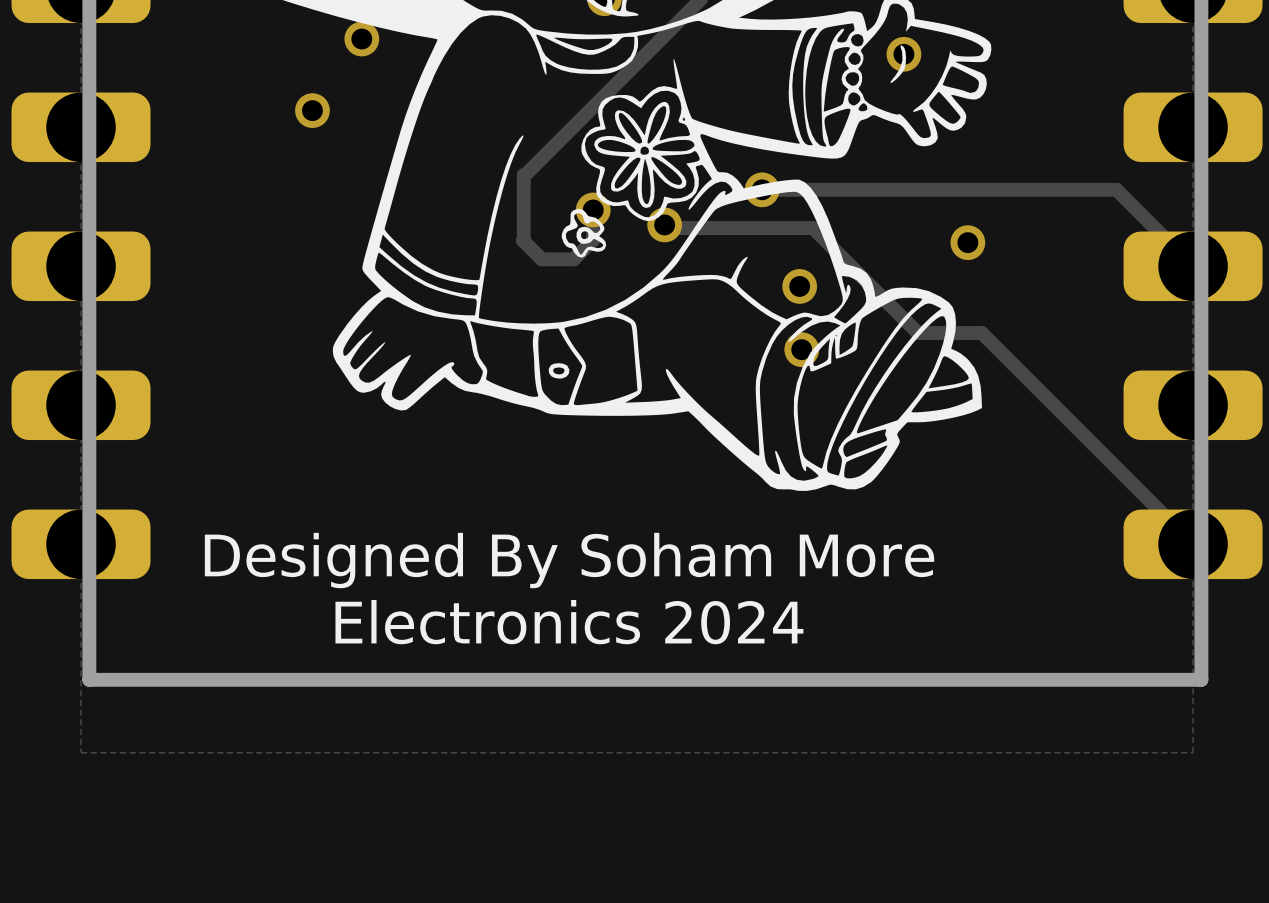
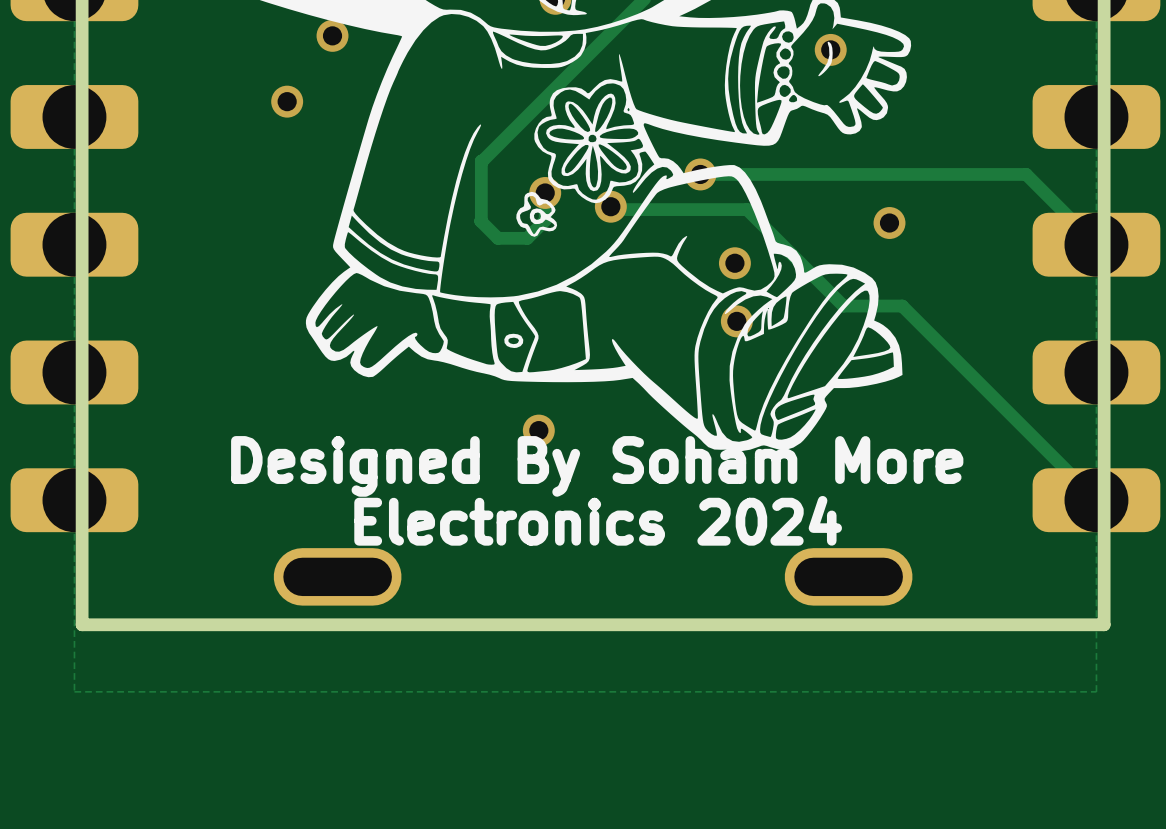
via: none -> (538, 430)
text position: Designed By Soham More (569, 560) -> Designed By Soham More (597, 466)
text position: Electronics 2024 (569, 622) -> Electronics 2024 (598, 520)
part: none -> (337, 576)
part: none -> (848, 576)

